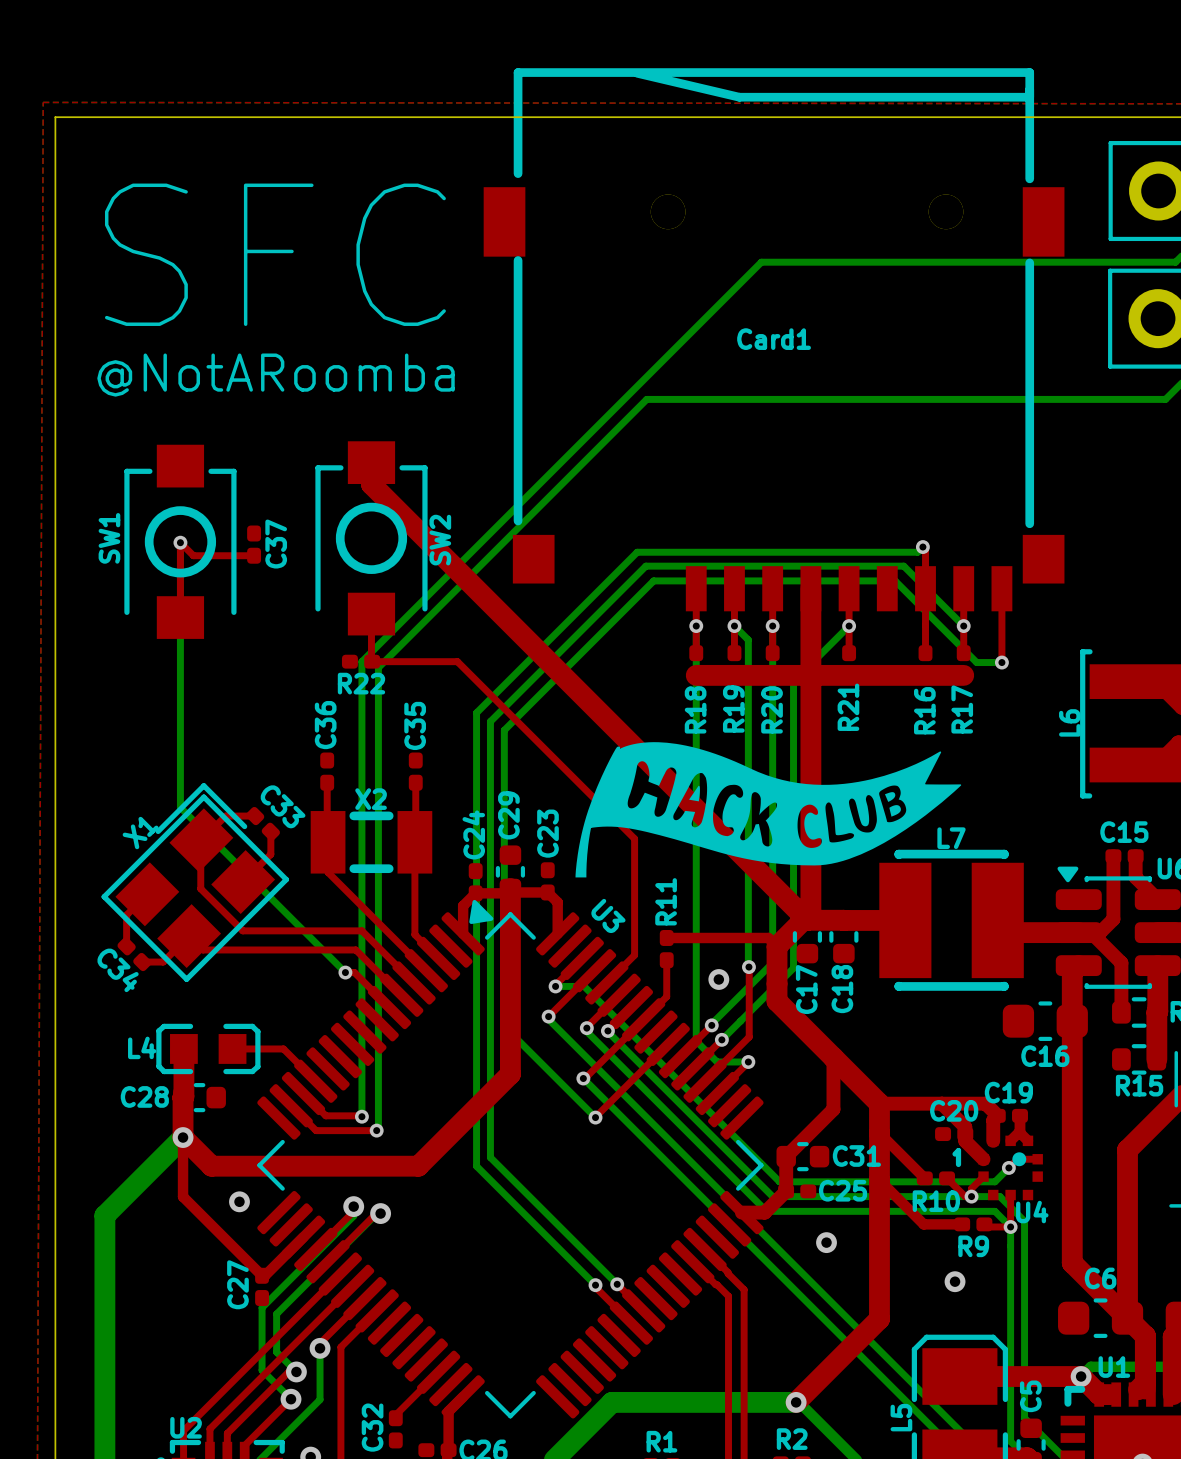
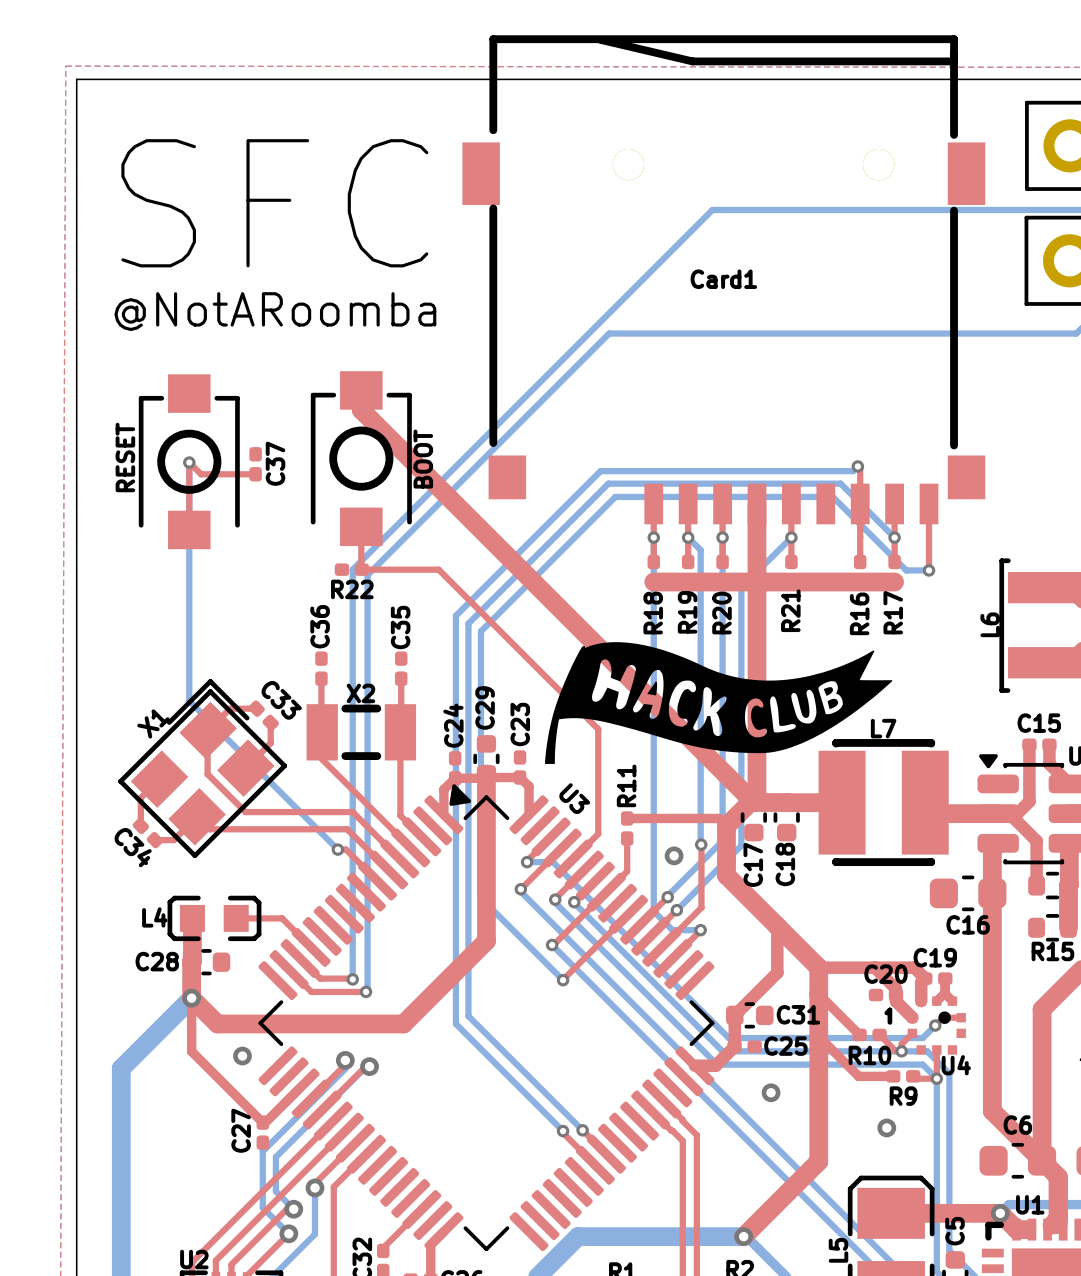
SW1 name: SW1 (109, 538) -> RESET (125, 457)
SW2 name: SW2 (440, 540) -> BOOT (423, 459)

